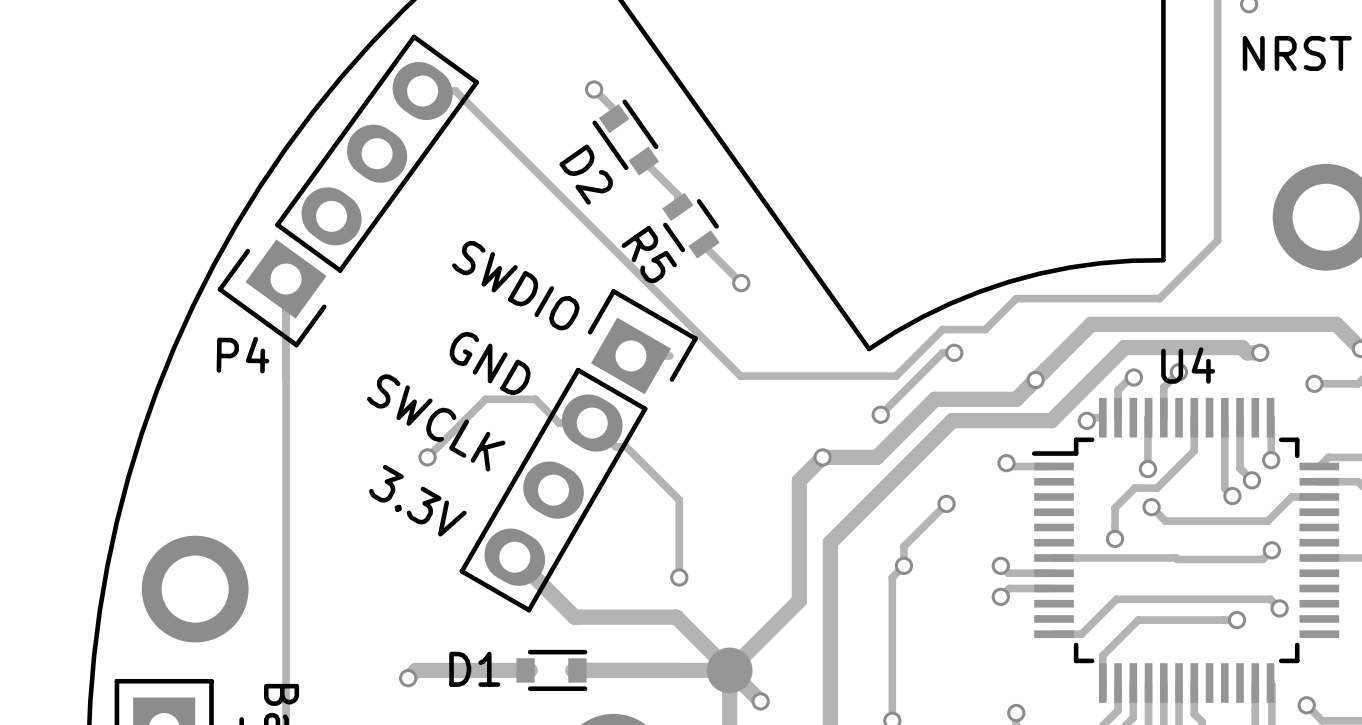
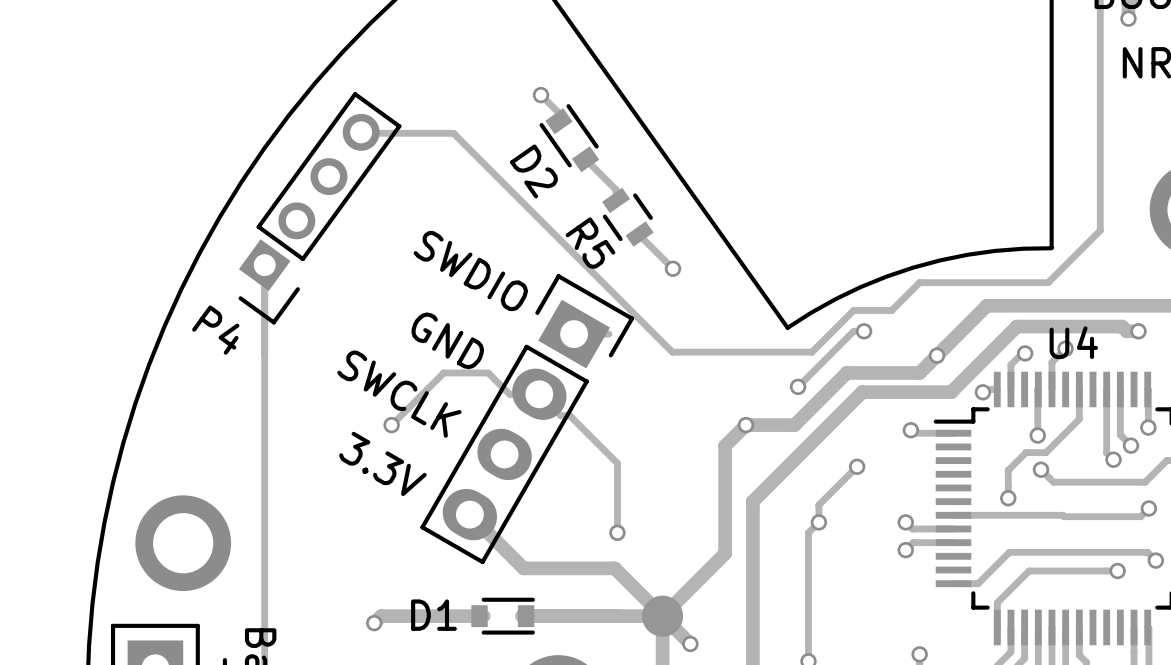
P4 footprint: [217, 34, 480, 348] -> [238, 92, 402, 325]
track: (422, 91) (455, 91) (496, 132) -> (360, 133) (453, 133)

